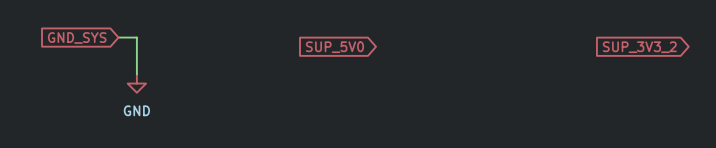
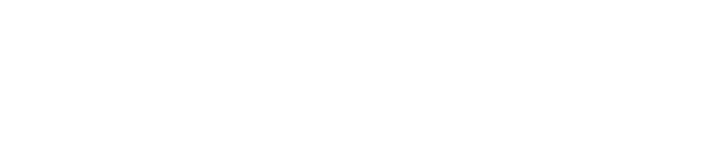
global label: GND_SYS (77, 37) -> none
wire: (118, 37) (136, 37) (136, 74) -> none
global label: SUP_5V0 (334, 47) -> none
global label: SUP_3V3_2 (639, 47) -> none
power symbol: GND (136, 83) -> none

